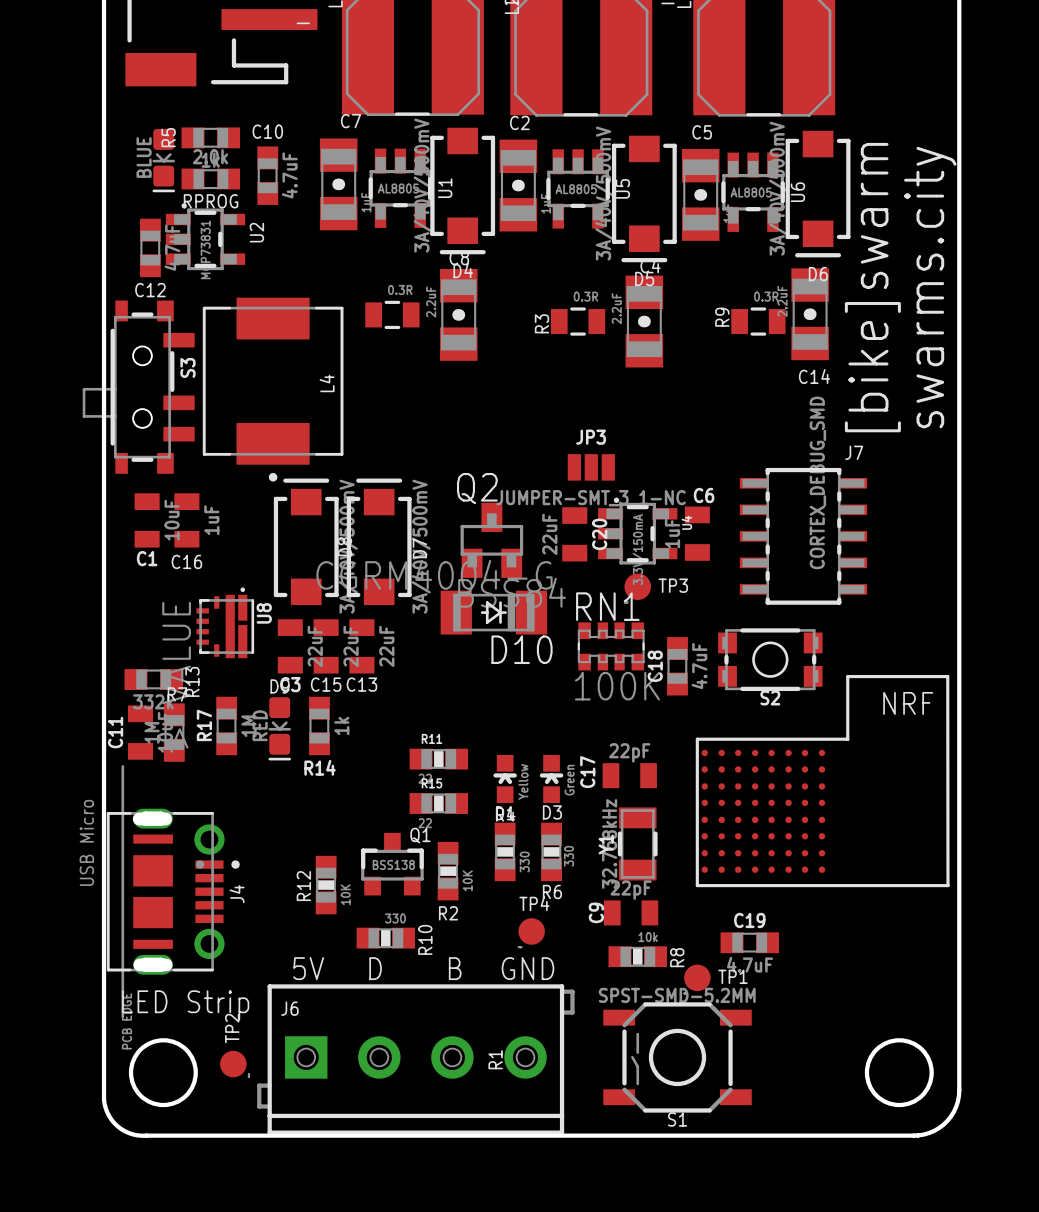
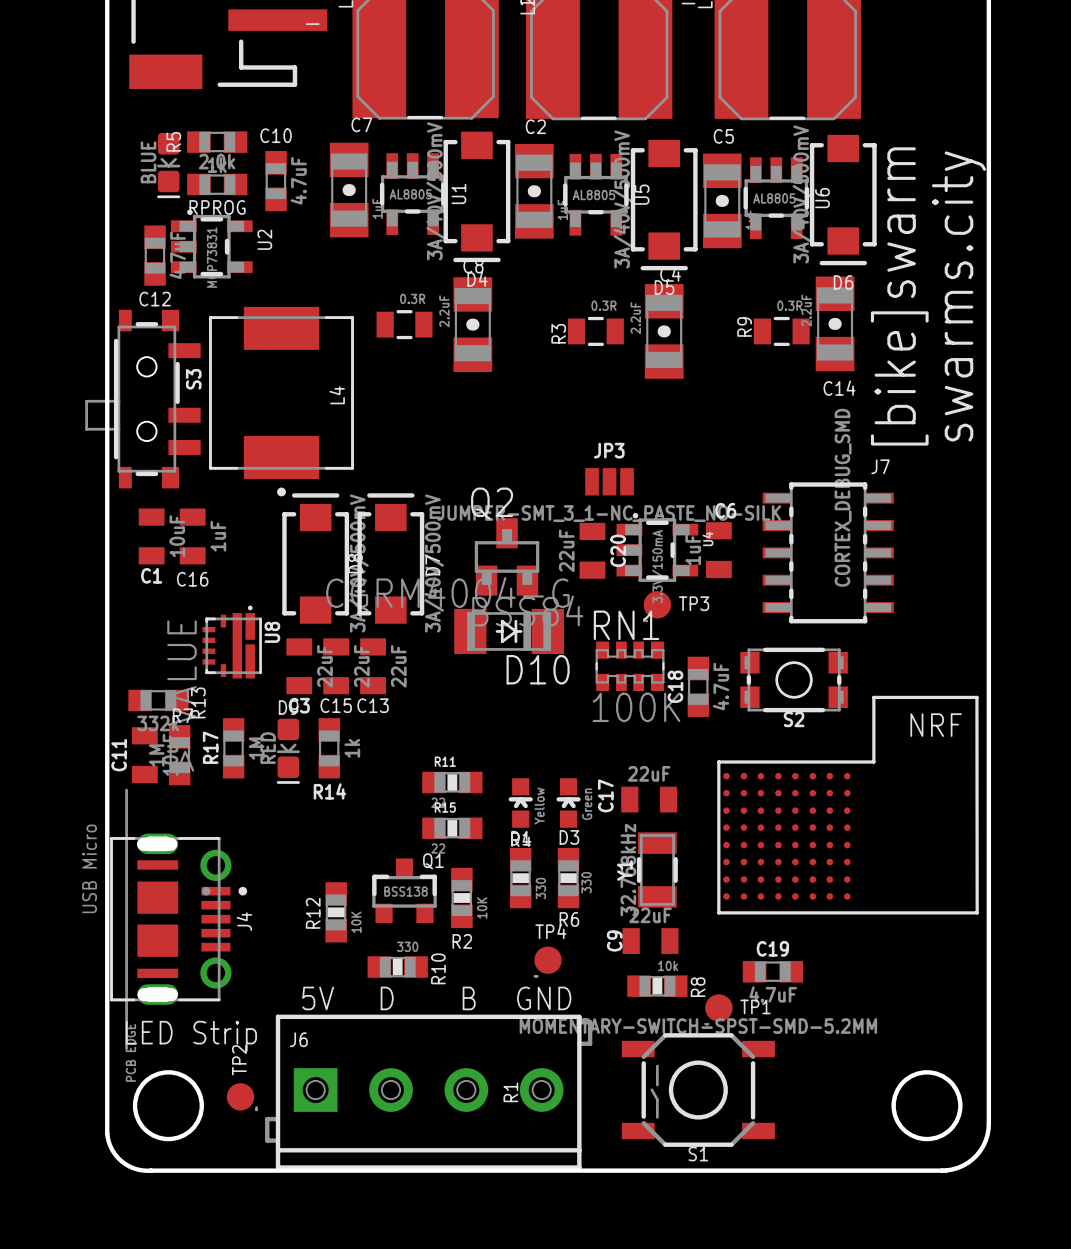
JP3 value: JUMPER-SMT_3_1-NC (591, 498) -> JUMPER-SMT_3_1-NC_PASTE_NO-SILK (609, 513)
C17 value: 22pF (629, 752) -> 22uF (649, 773)
C9 value: 22pF (631, 890) -> 22uF (650, 915)
S1 value: SPST-SMD-5.2MM (677, 995) -> MOMENTARY-SWITCH-SPST-SMD-5.2MM (698, 1026)

